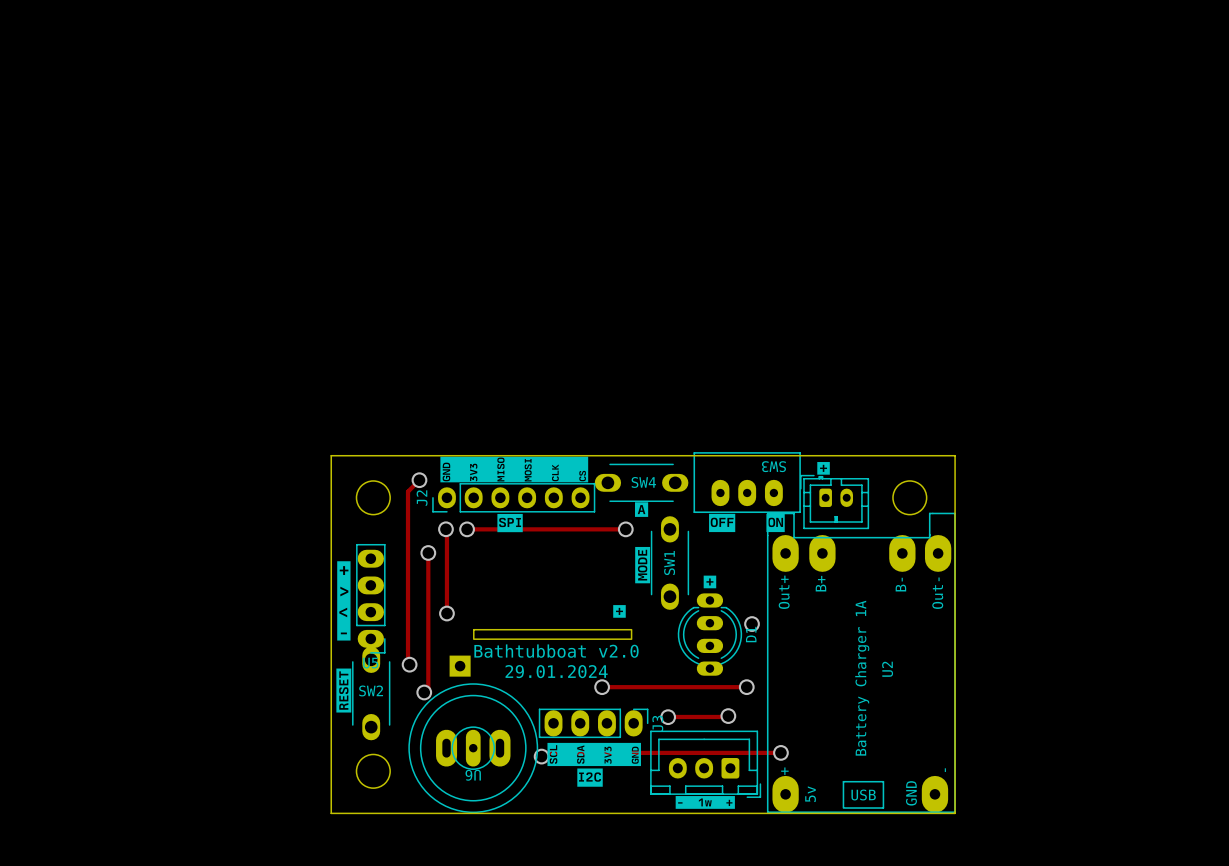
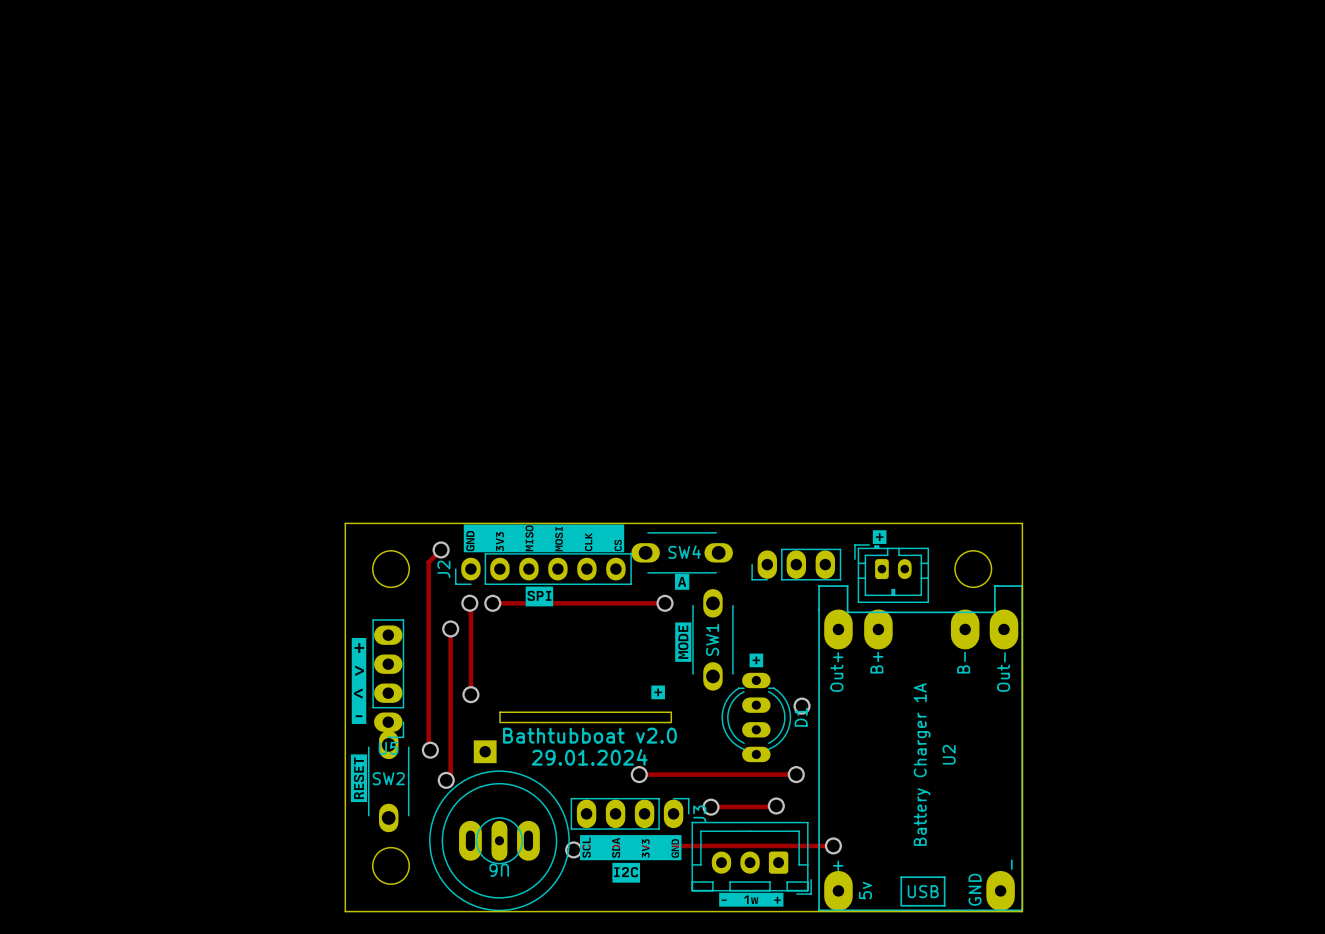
SW3: (747, 482) -> none
part: none -> (796, 564)
drawing: [709, 513, 736, 533] -> none
drawing: [766, 513, 785, 533] -> none

